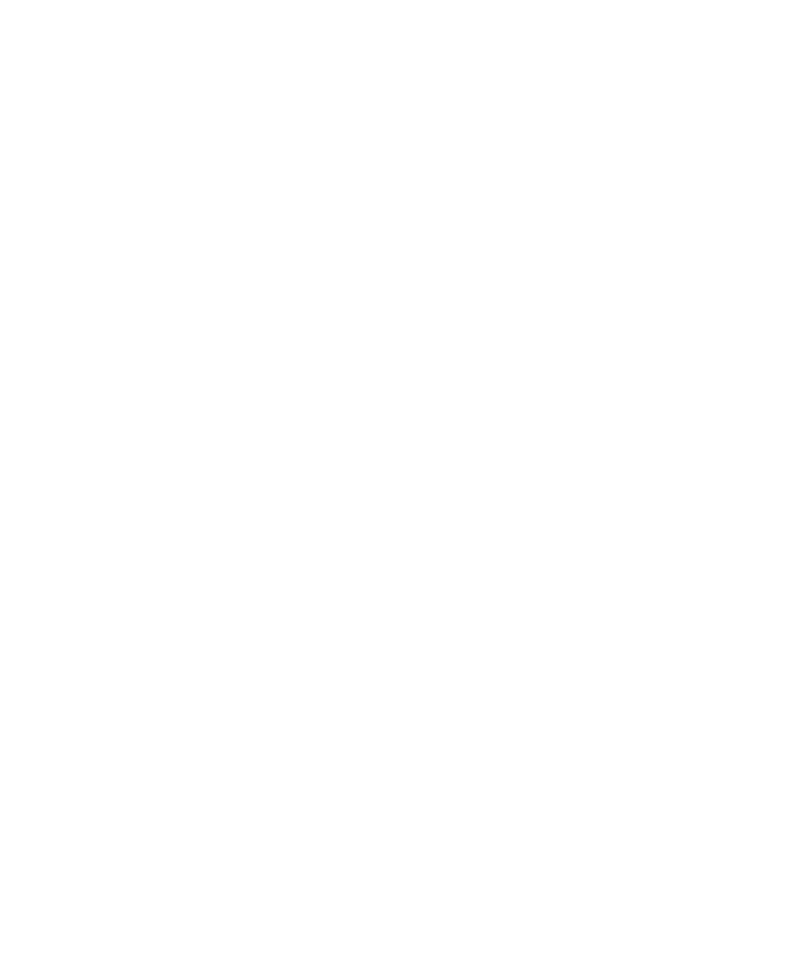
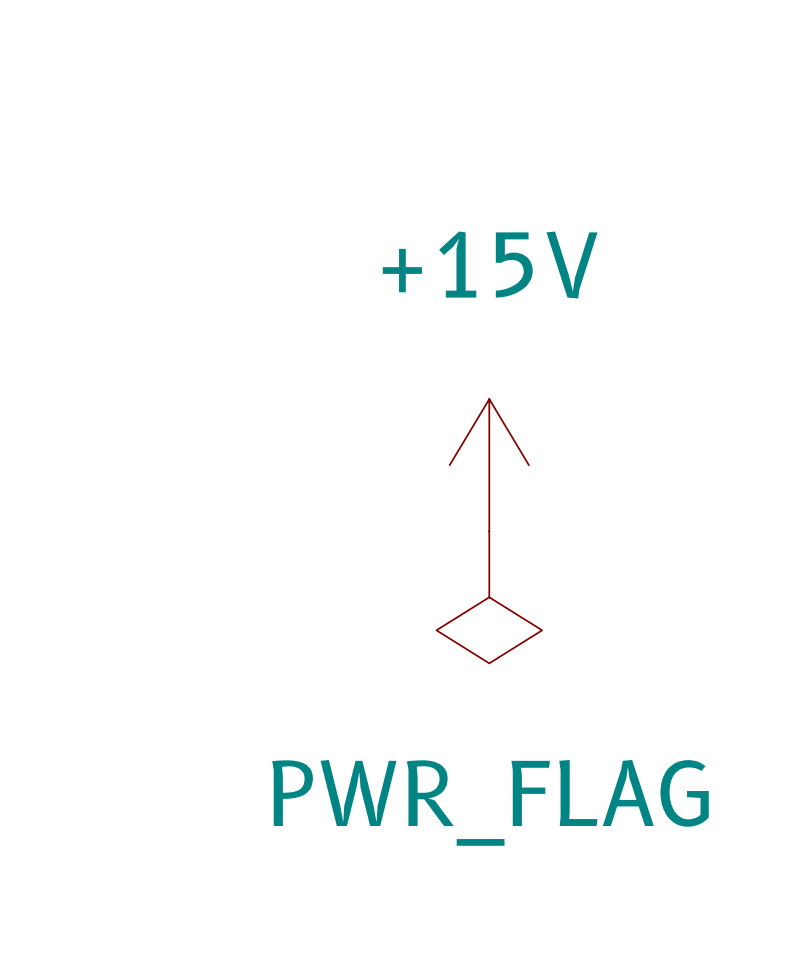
power symbol: none -> +15V (489, 465)
power symbol: none -> PWR_FLAG (489, 597)

